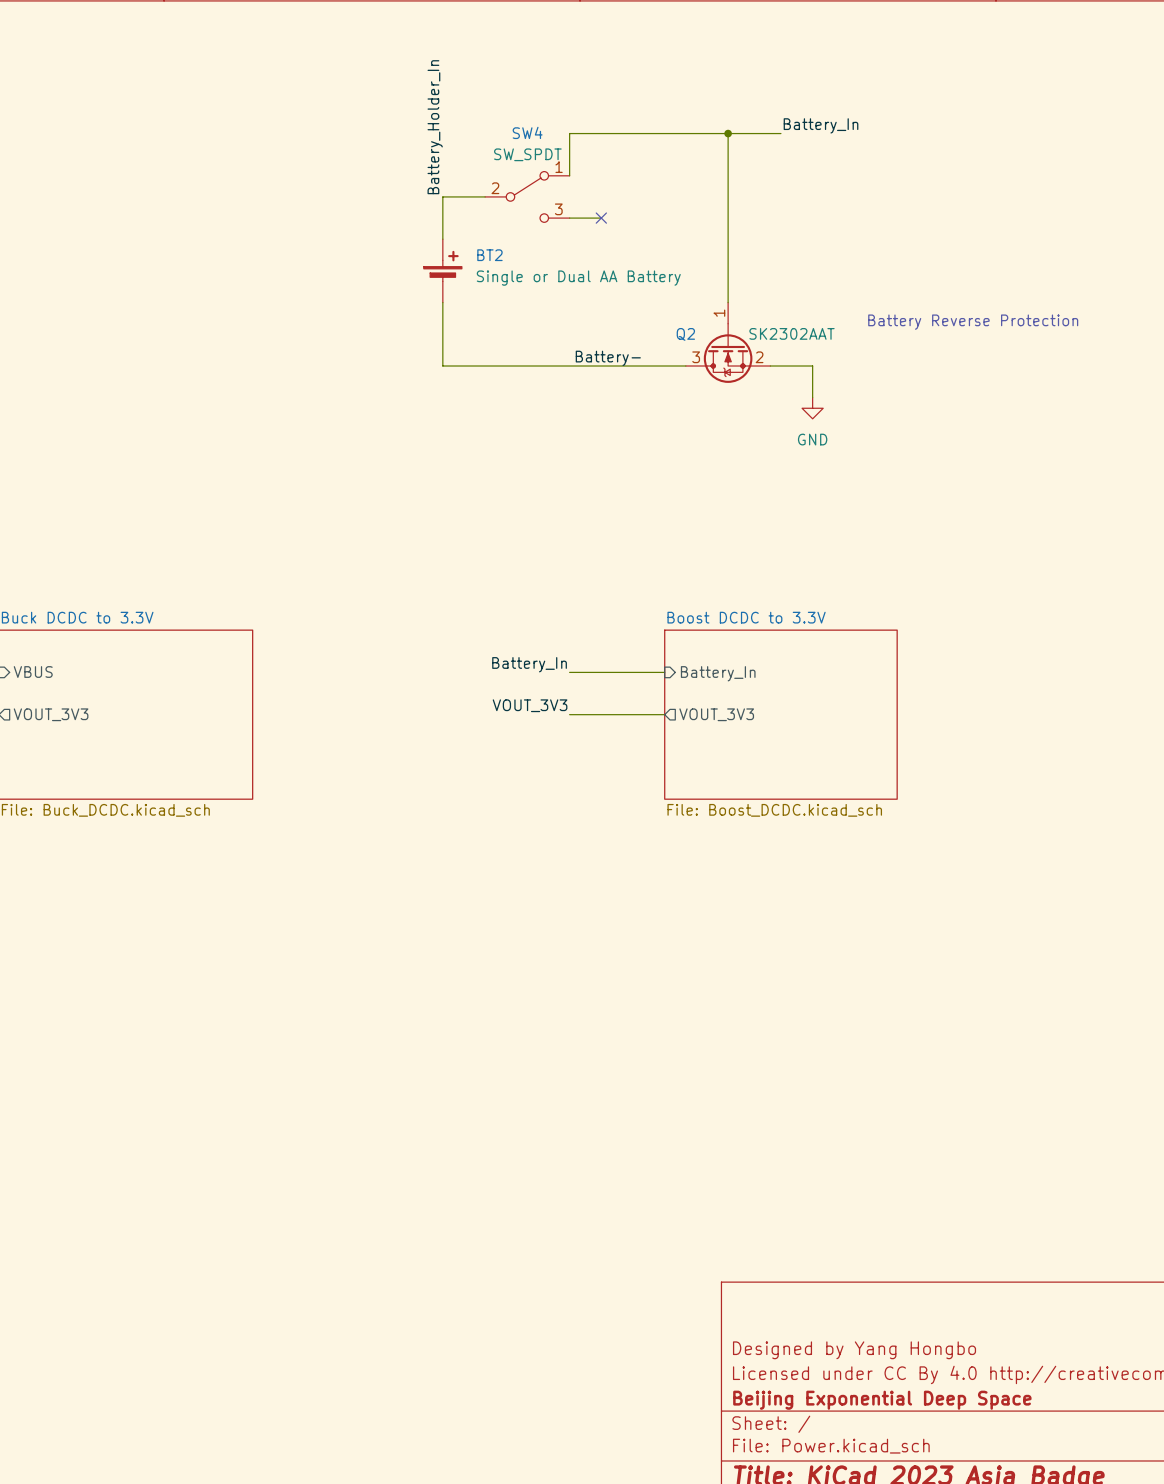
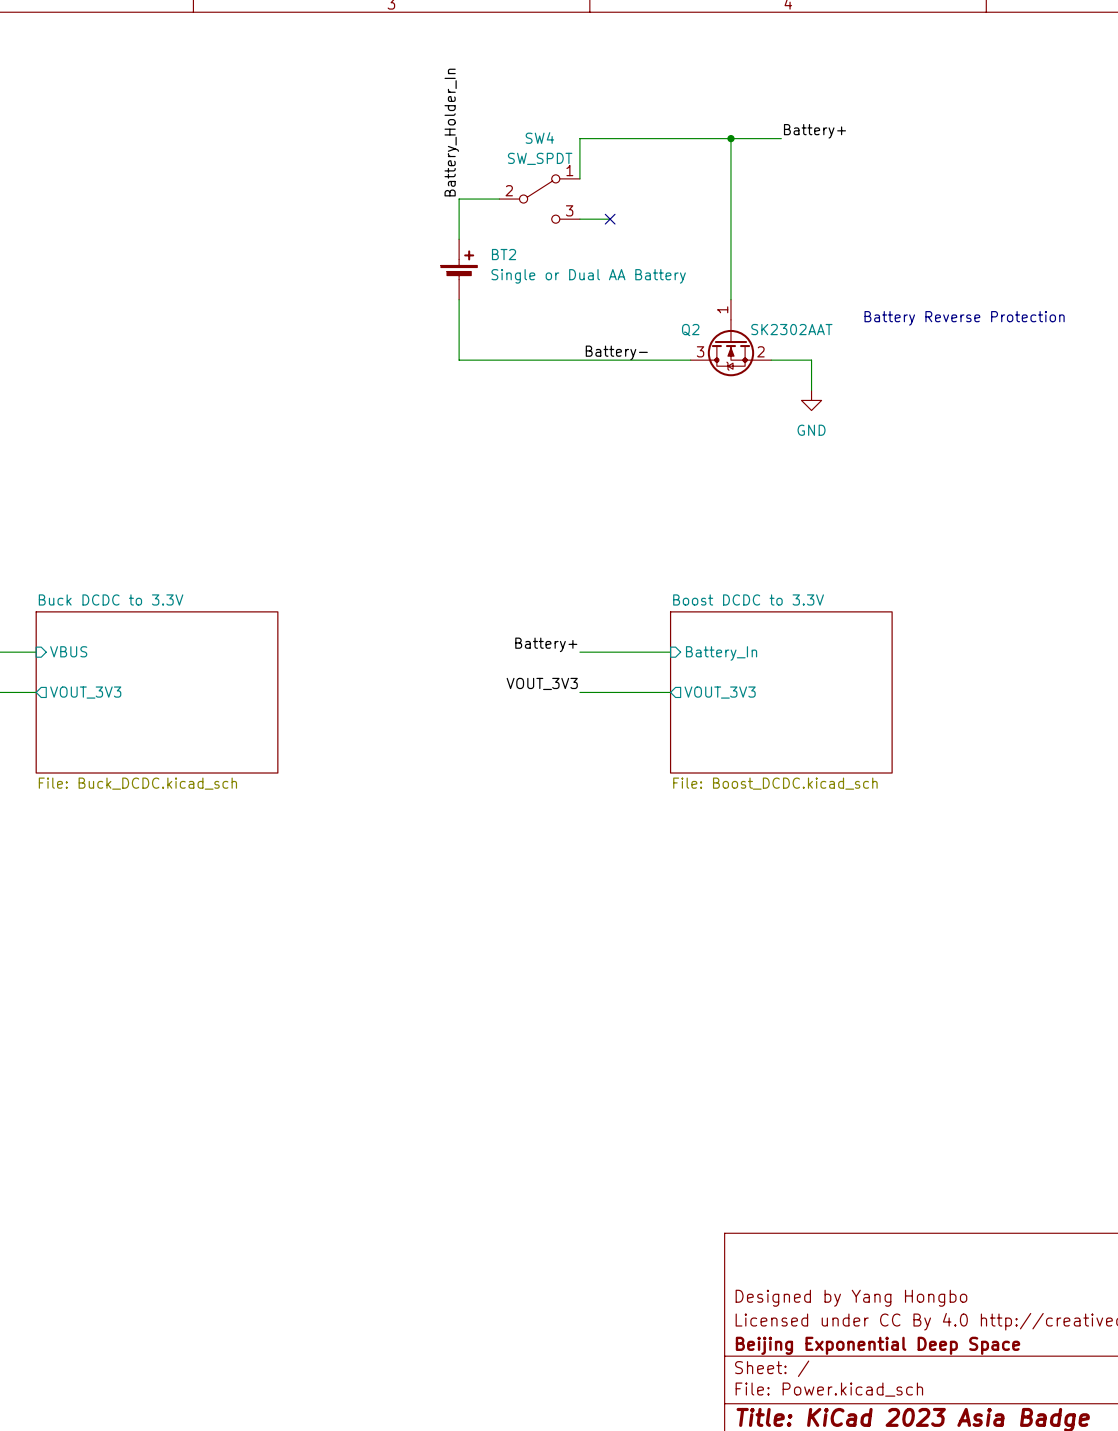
label: Battery_In (821, 125) -> Battery+ (814, 131)
label: Battery_In (529, 664) -> Battery+ (546, 644)

